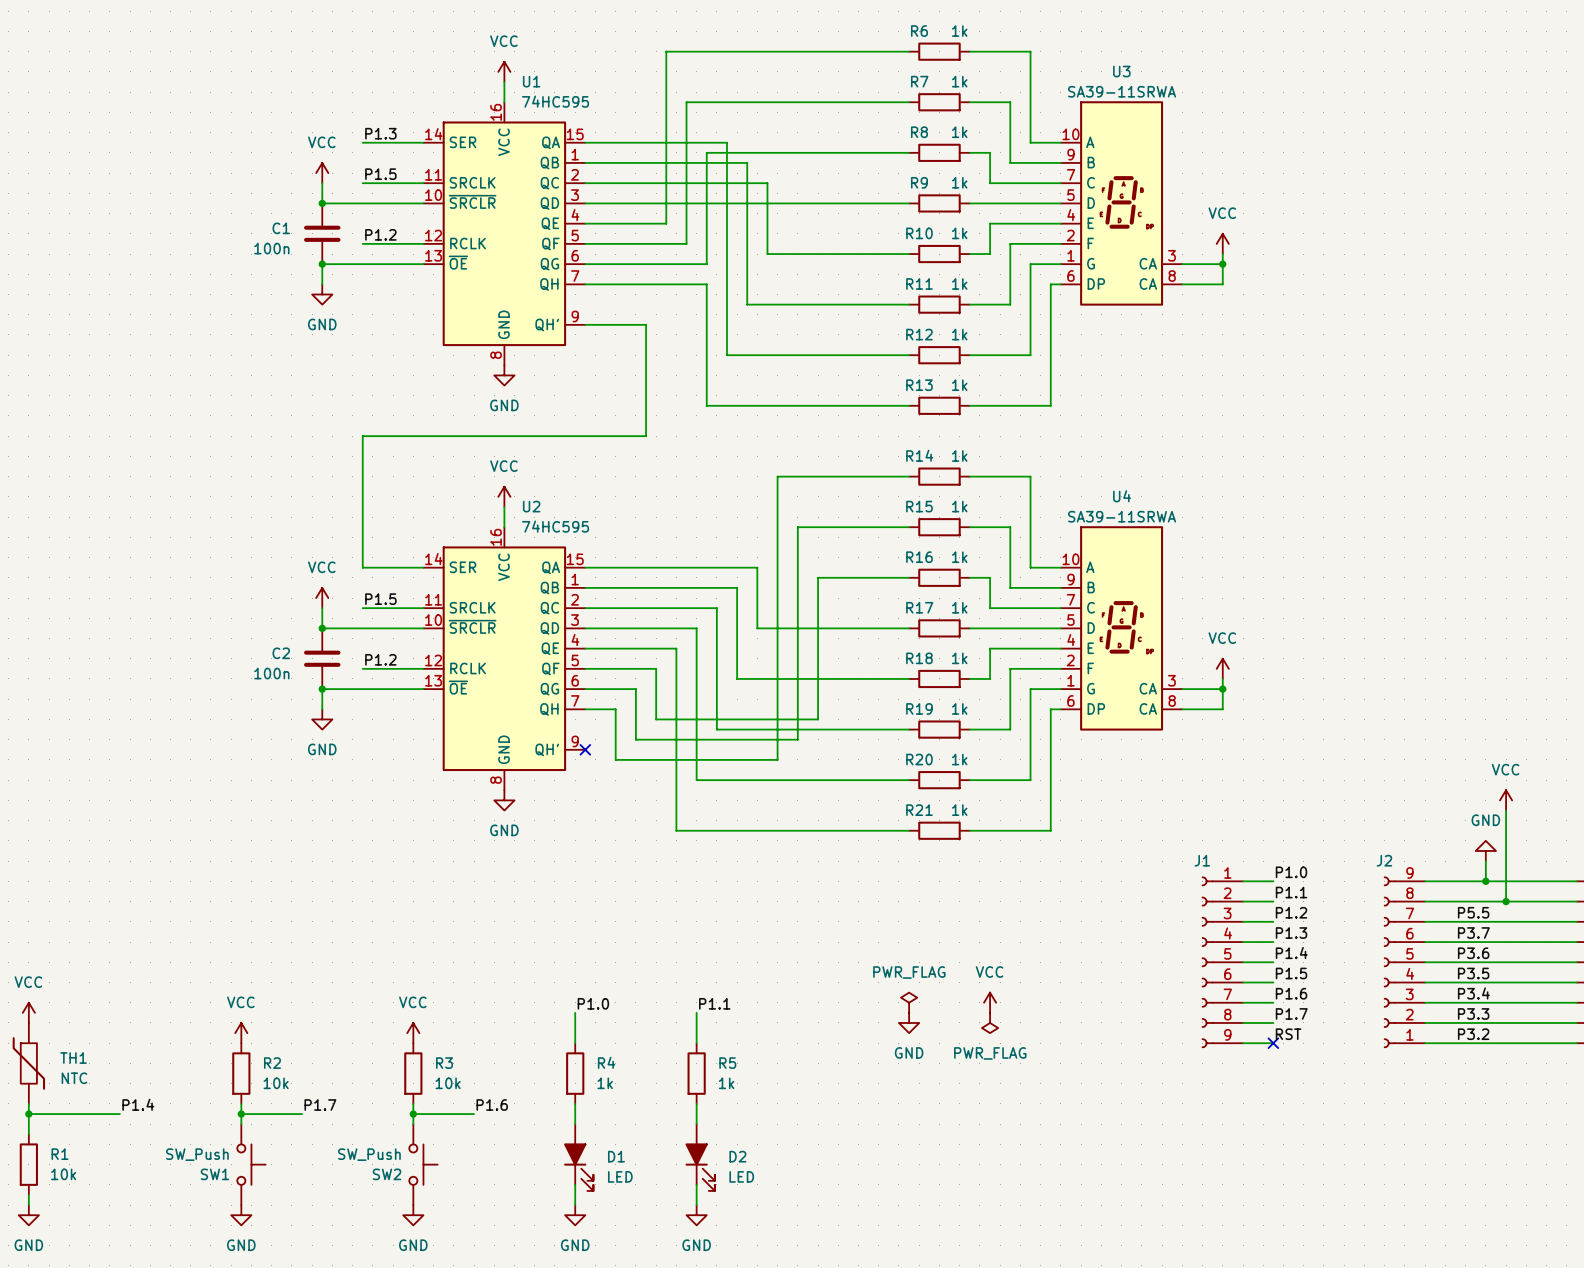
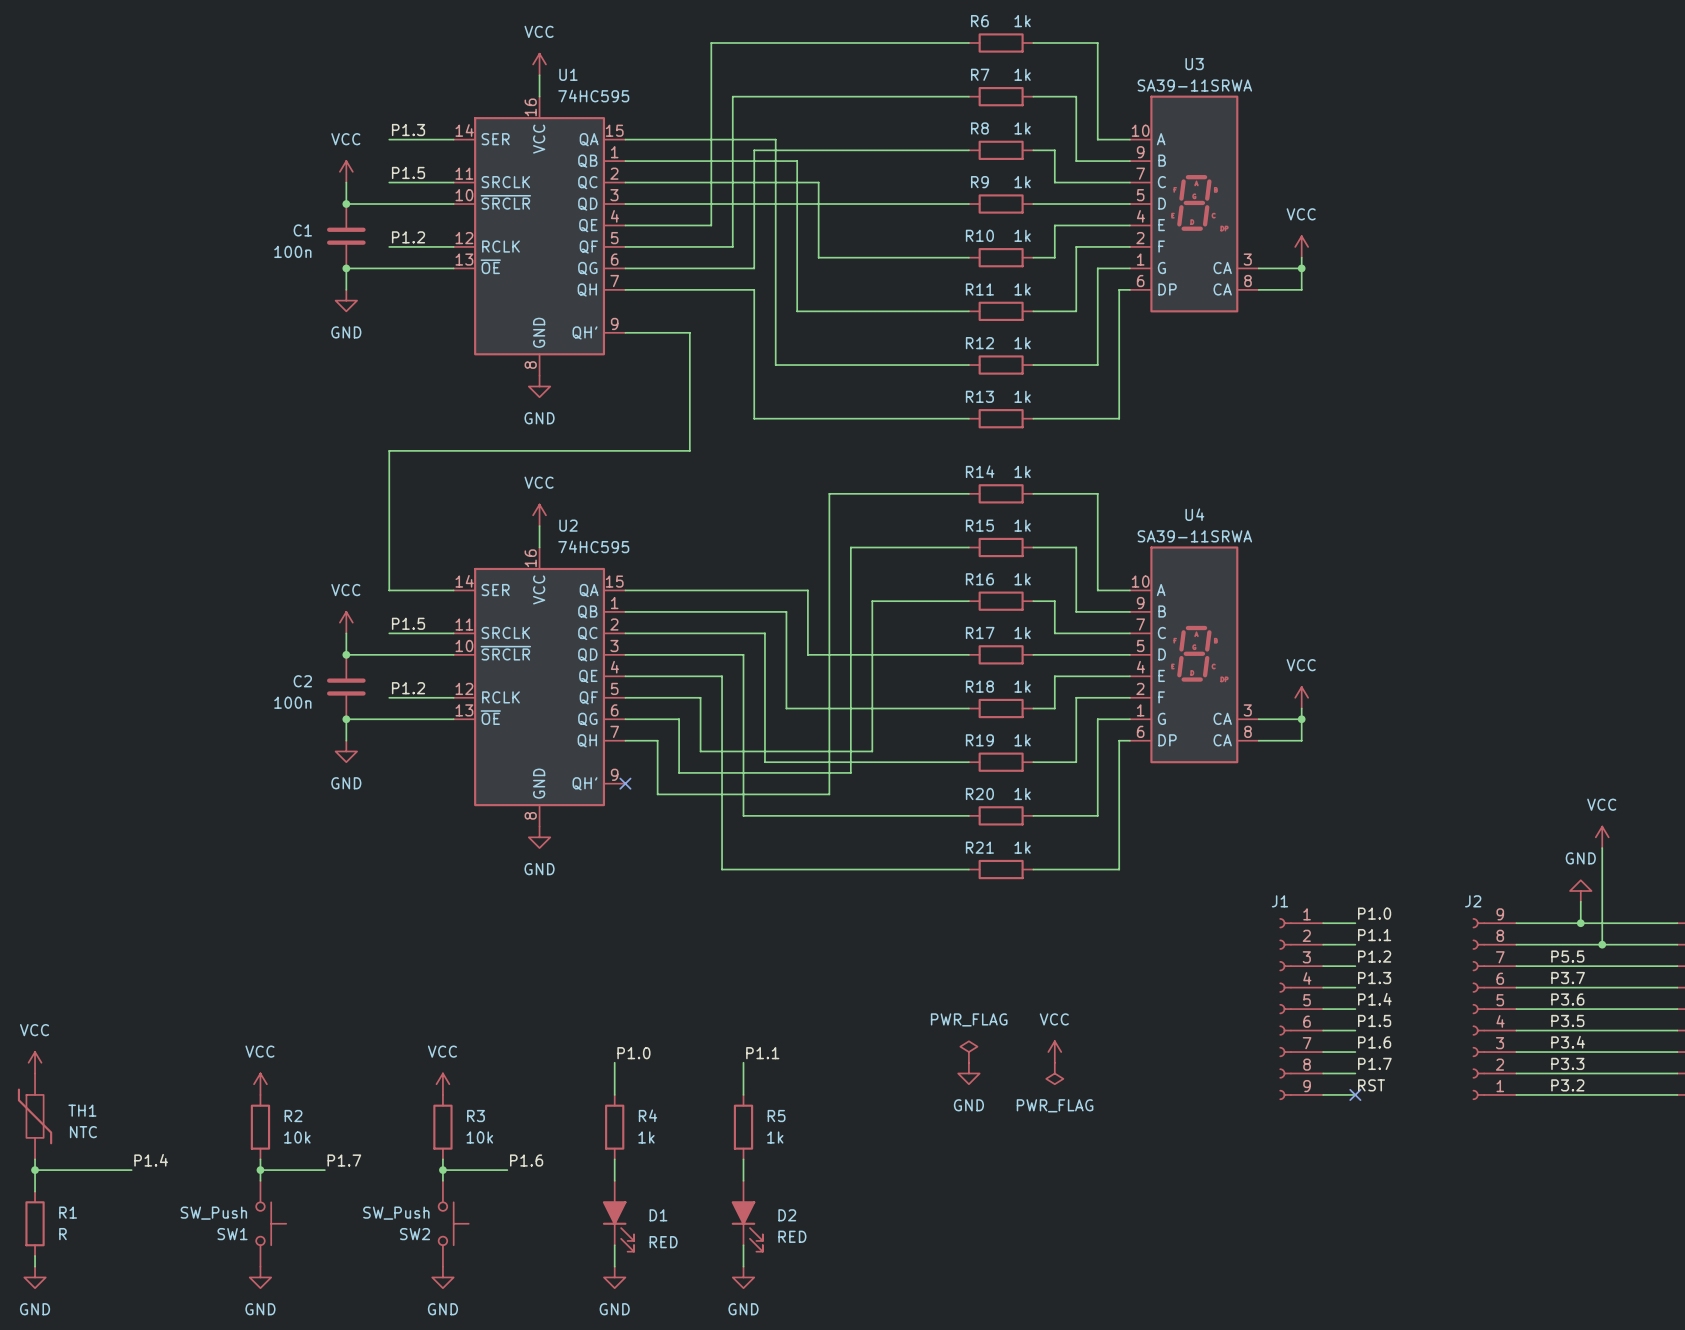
R1 value: 10k (63, 1174) -> R (62, 1234)
D1 value: LED (620, 1176) -> RED (663, 1242)
D2 value: LED (741, 1176) -> RED (792, 1236)

